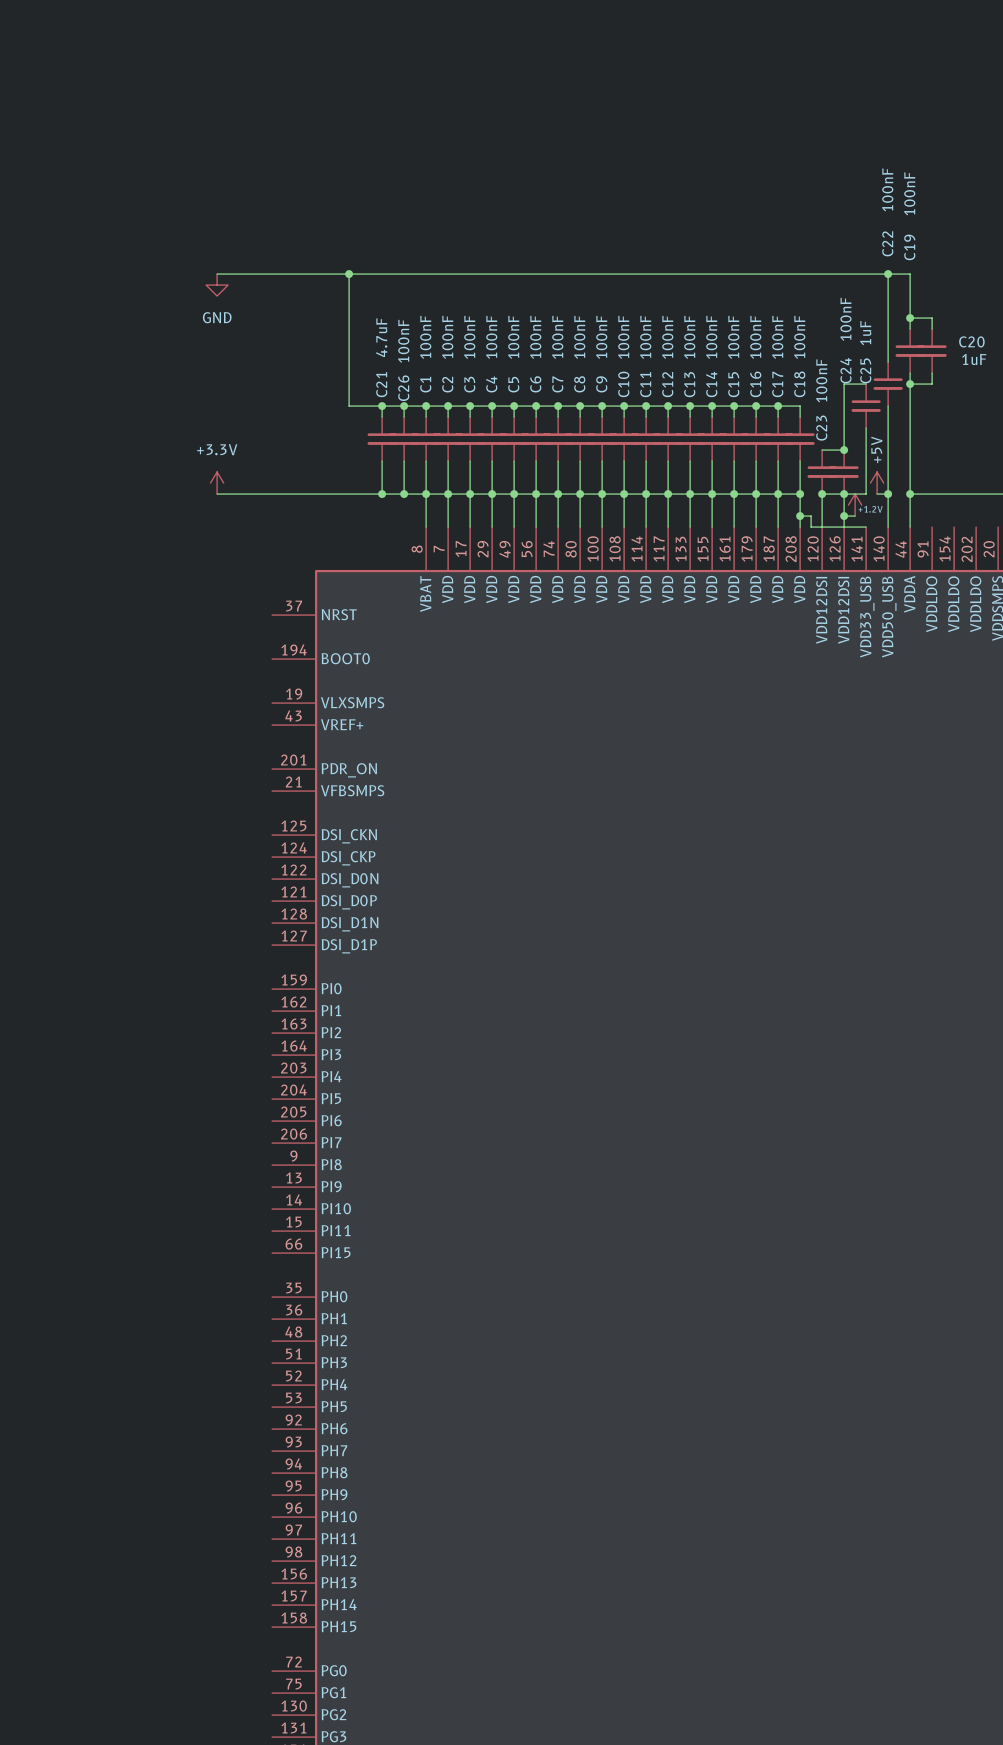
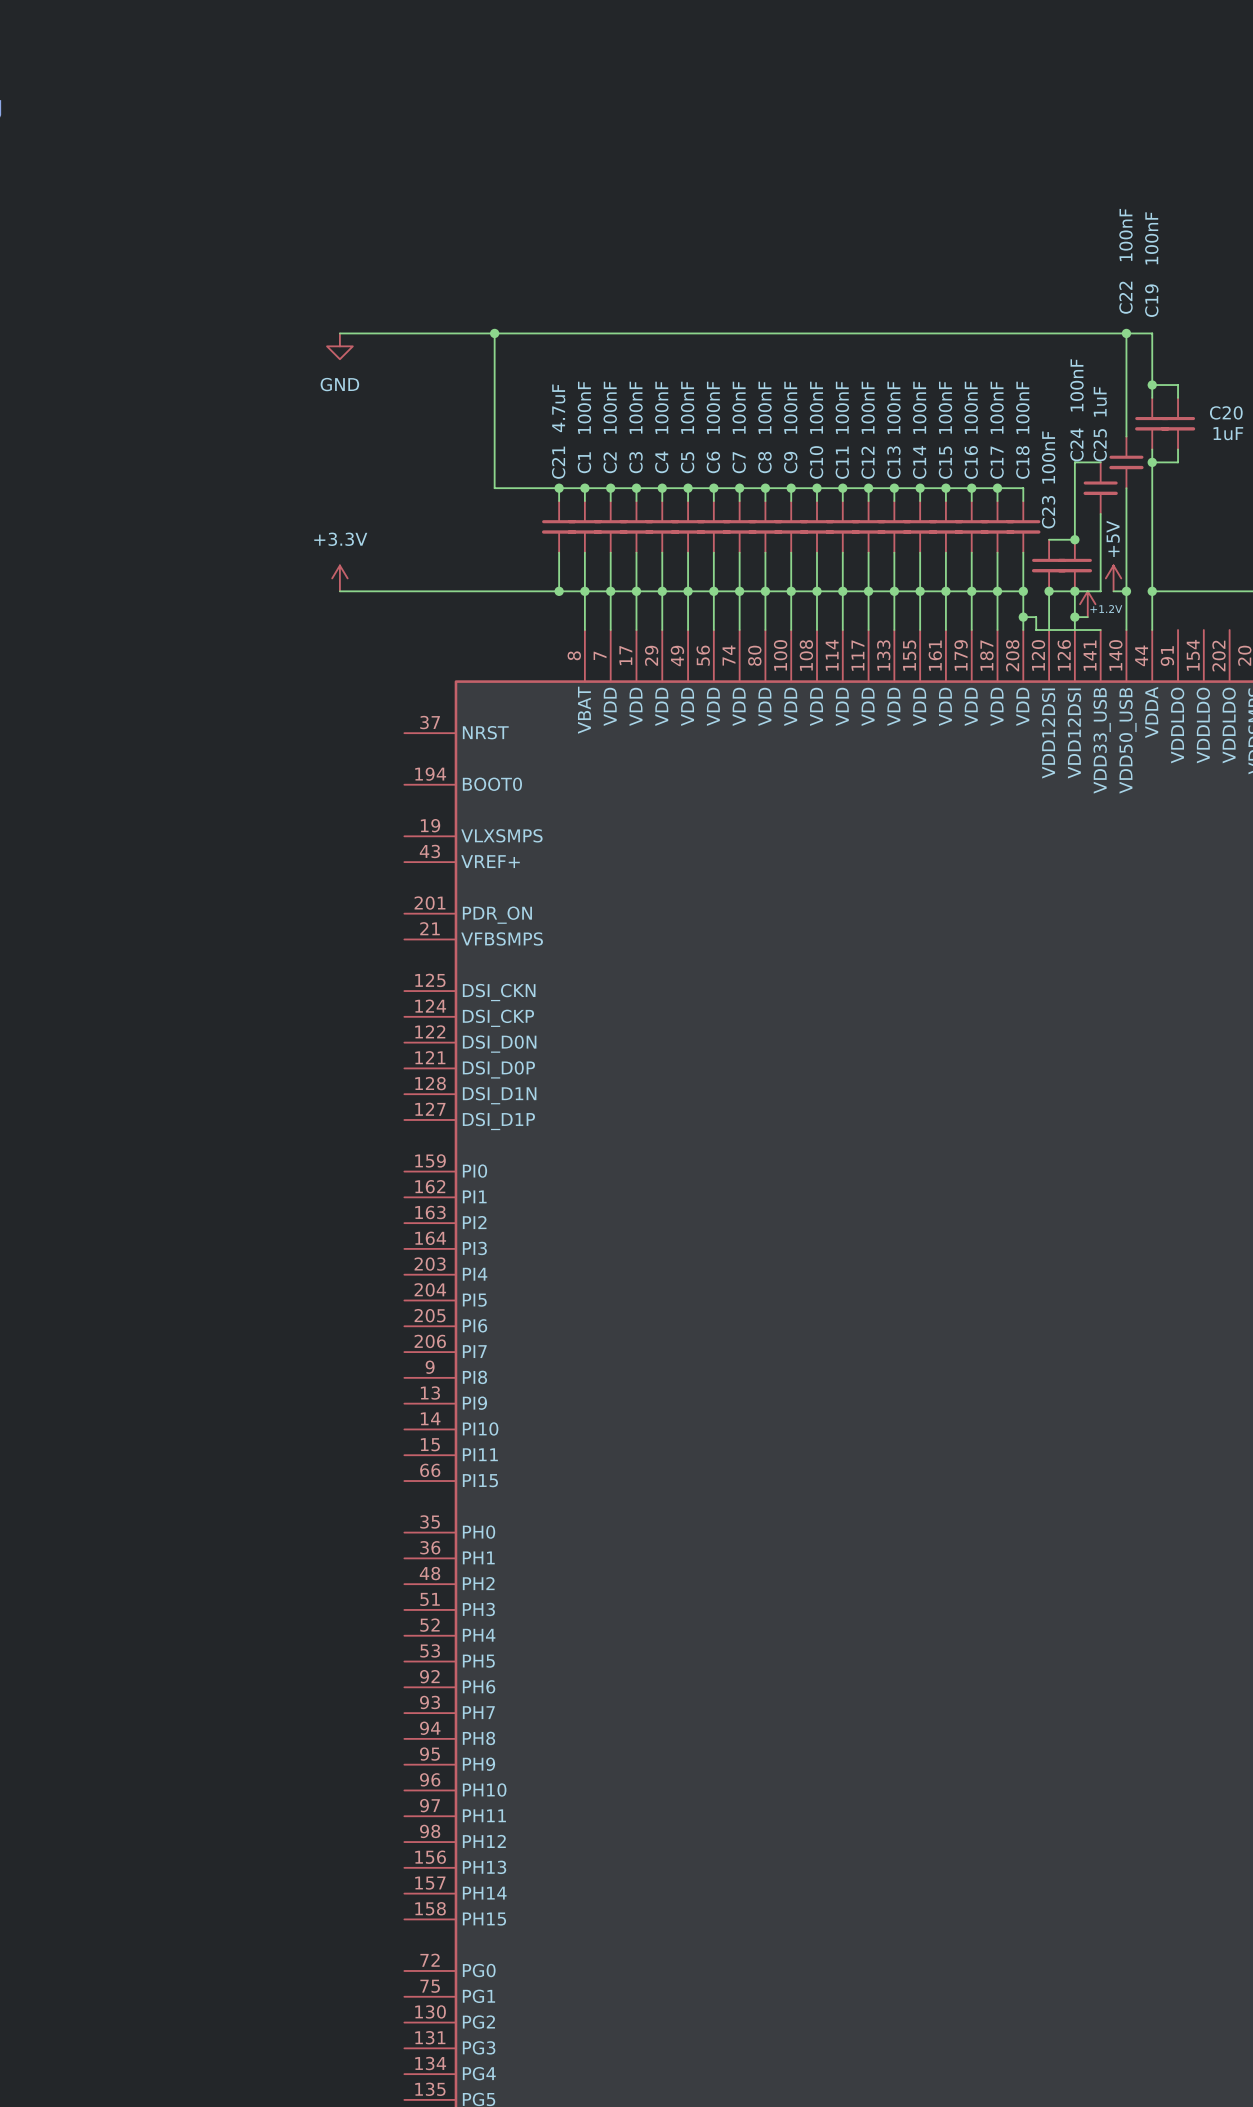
C26 value: 100nF (403, 341) -> 4.7uF (558, 408)
C26 name: C26 (403, 388) -> C21 (558, 462)
wire: (382, 406) (382, 417) -> none
junction: (382, 406) -> none
C21: 4.7uF (382, 439) -> none
wire: (382, 461) (382, 494) -> none
junction: (382, 494) -> none

